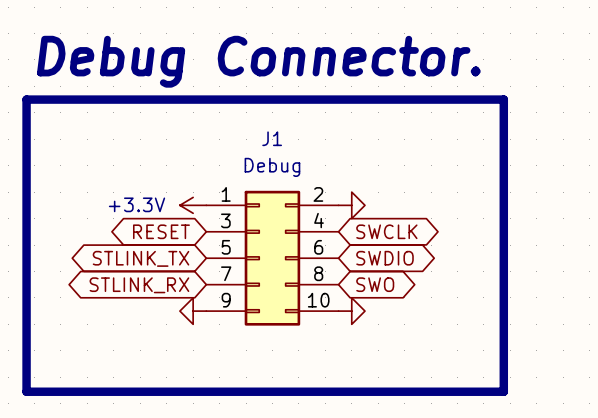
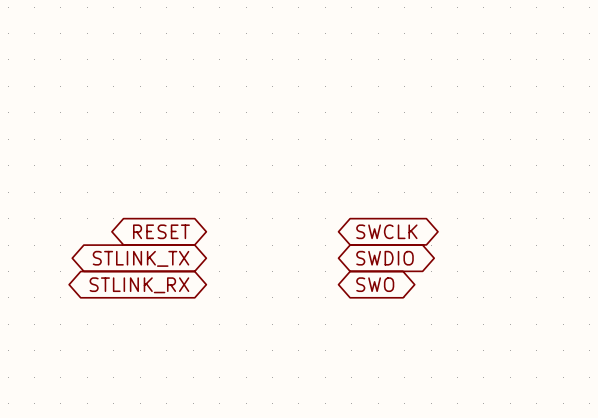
text: Debug Connector. (258, 61) -> none
line: (26, 99) (503, 99) (503, 391) (26, 391) (26, 99) -> none
power symbol: +3.3V (193, 205) -> none
power symbol: (351, 205) -> none
J1: Debug (272, 258) -> none
power symbol: (193, 311) -> none
power symbol: (351, 311) -> none

